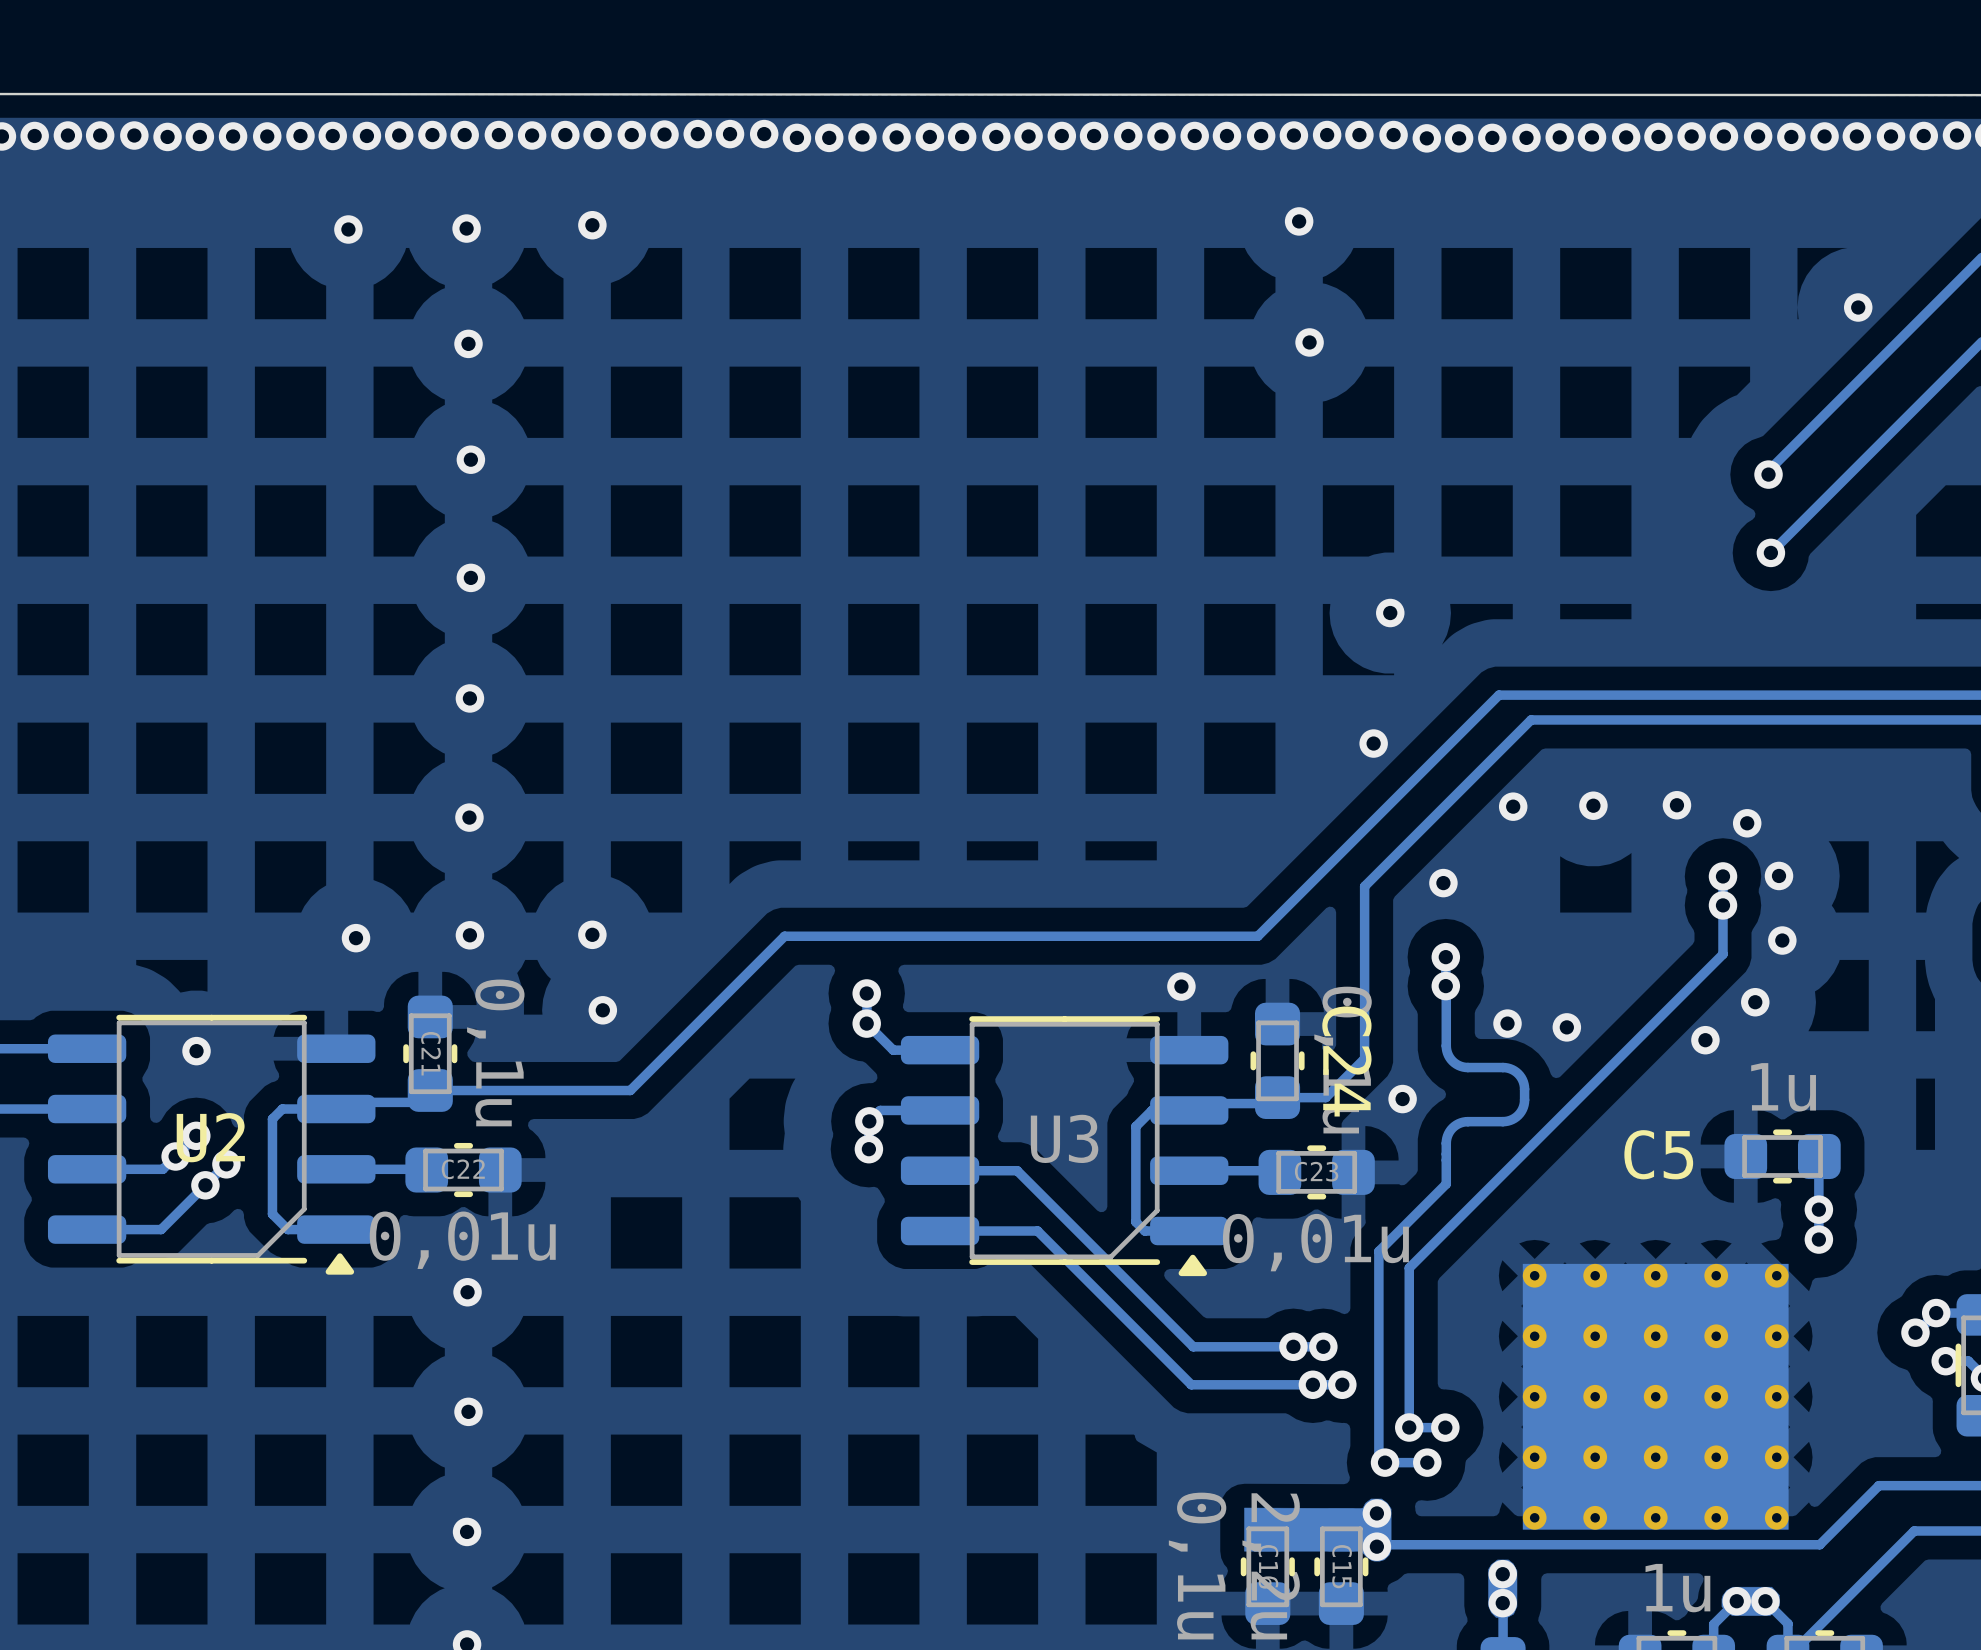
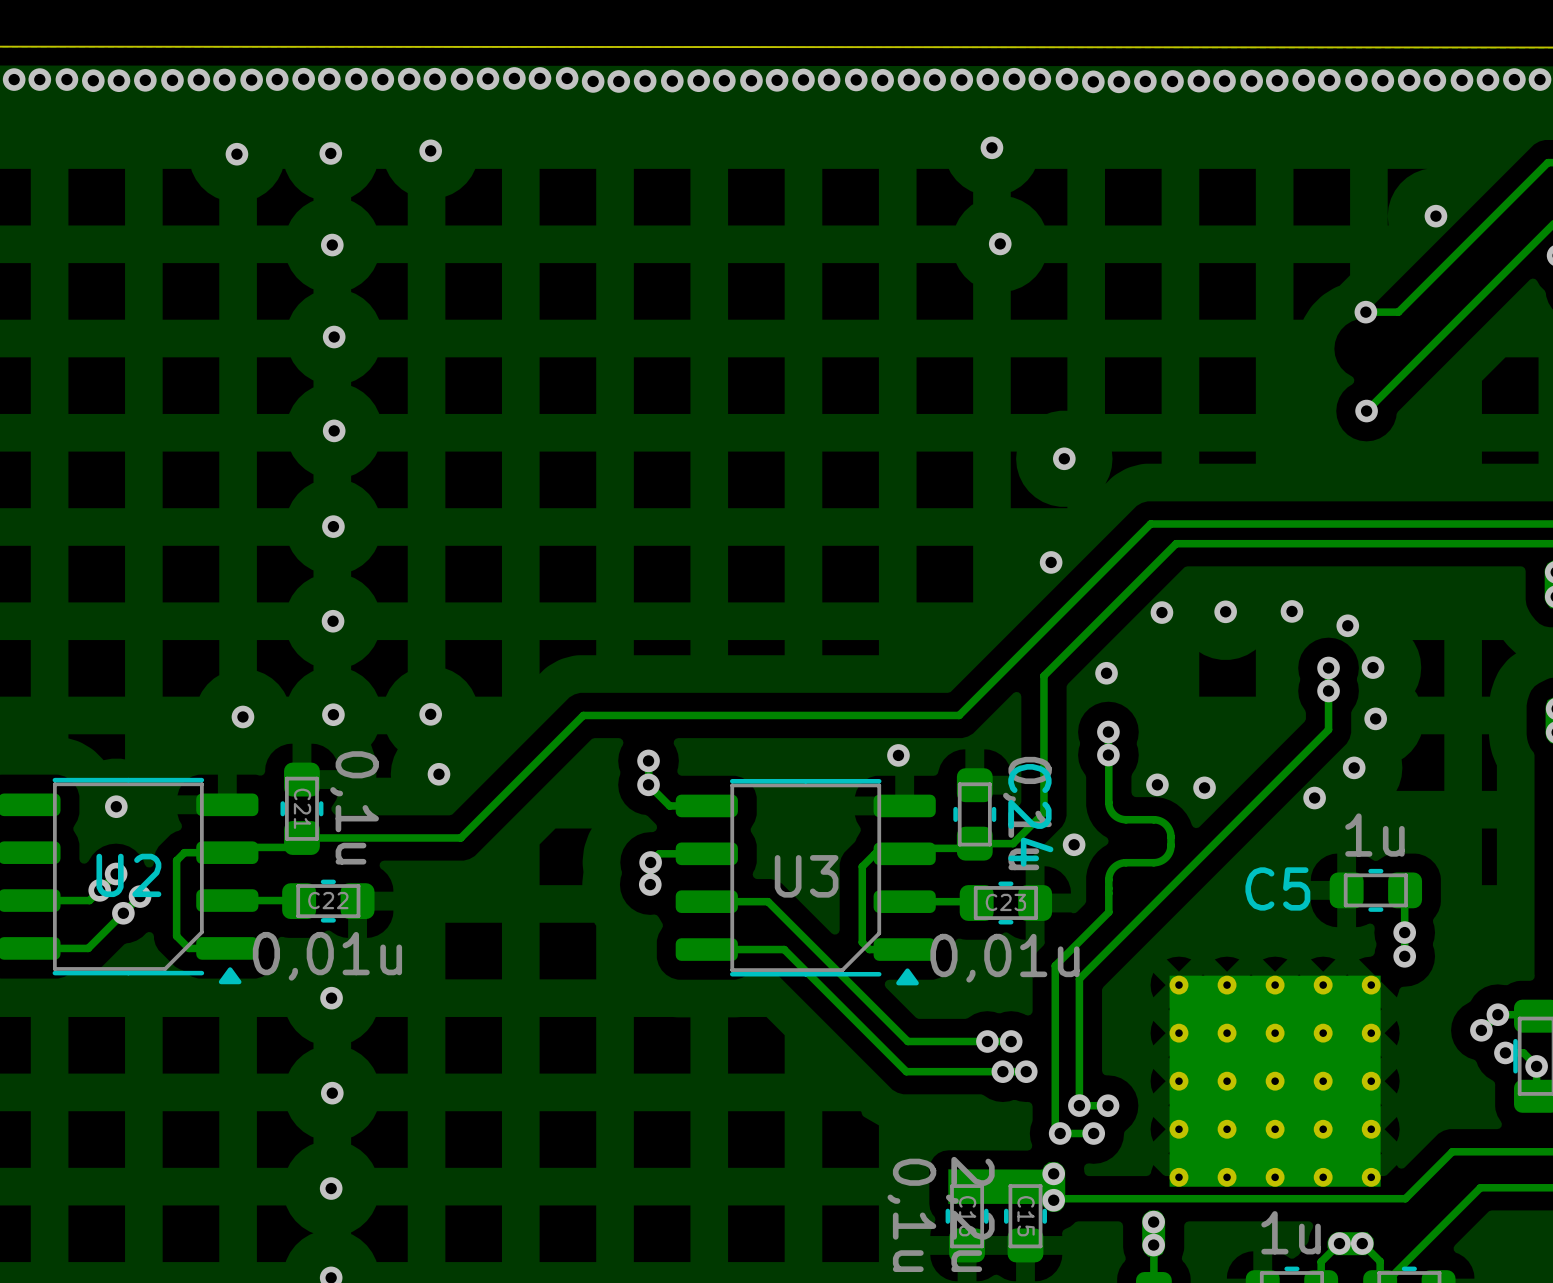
track: (1811, 428) (1768, 470) (1768, 474) -> (1398, 312) (1365, 312)
via position: (1768, 474) -> (1365, 312)

